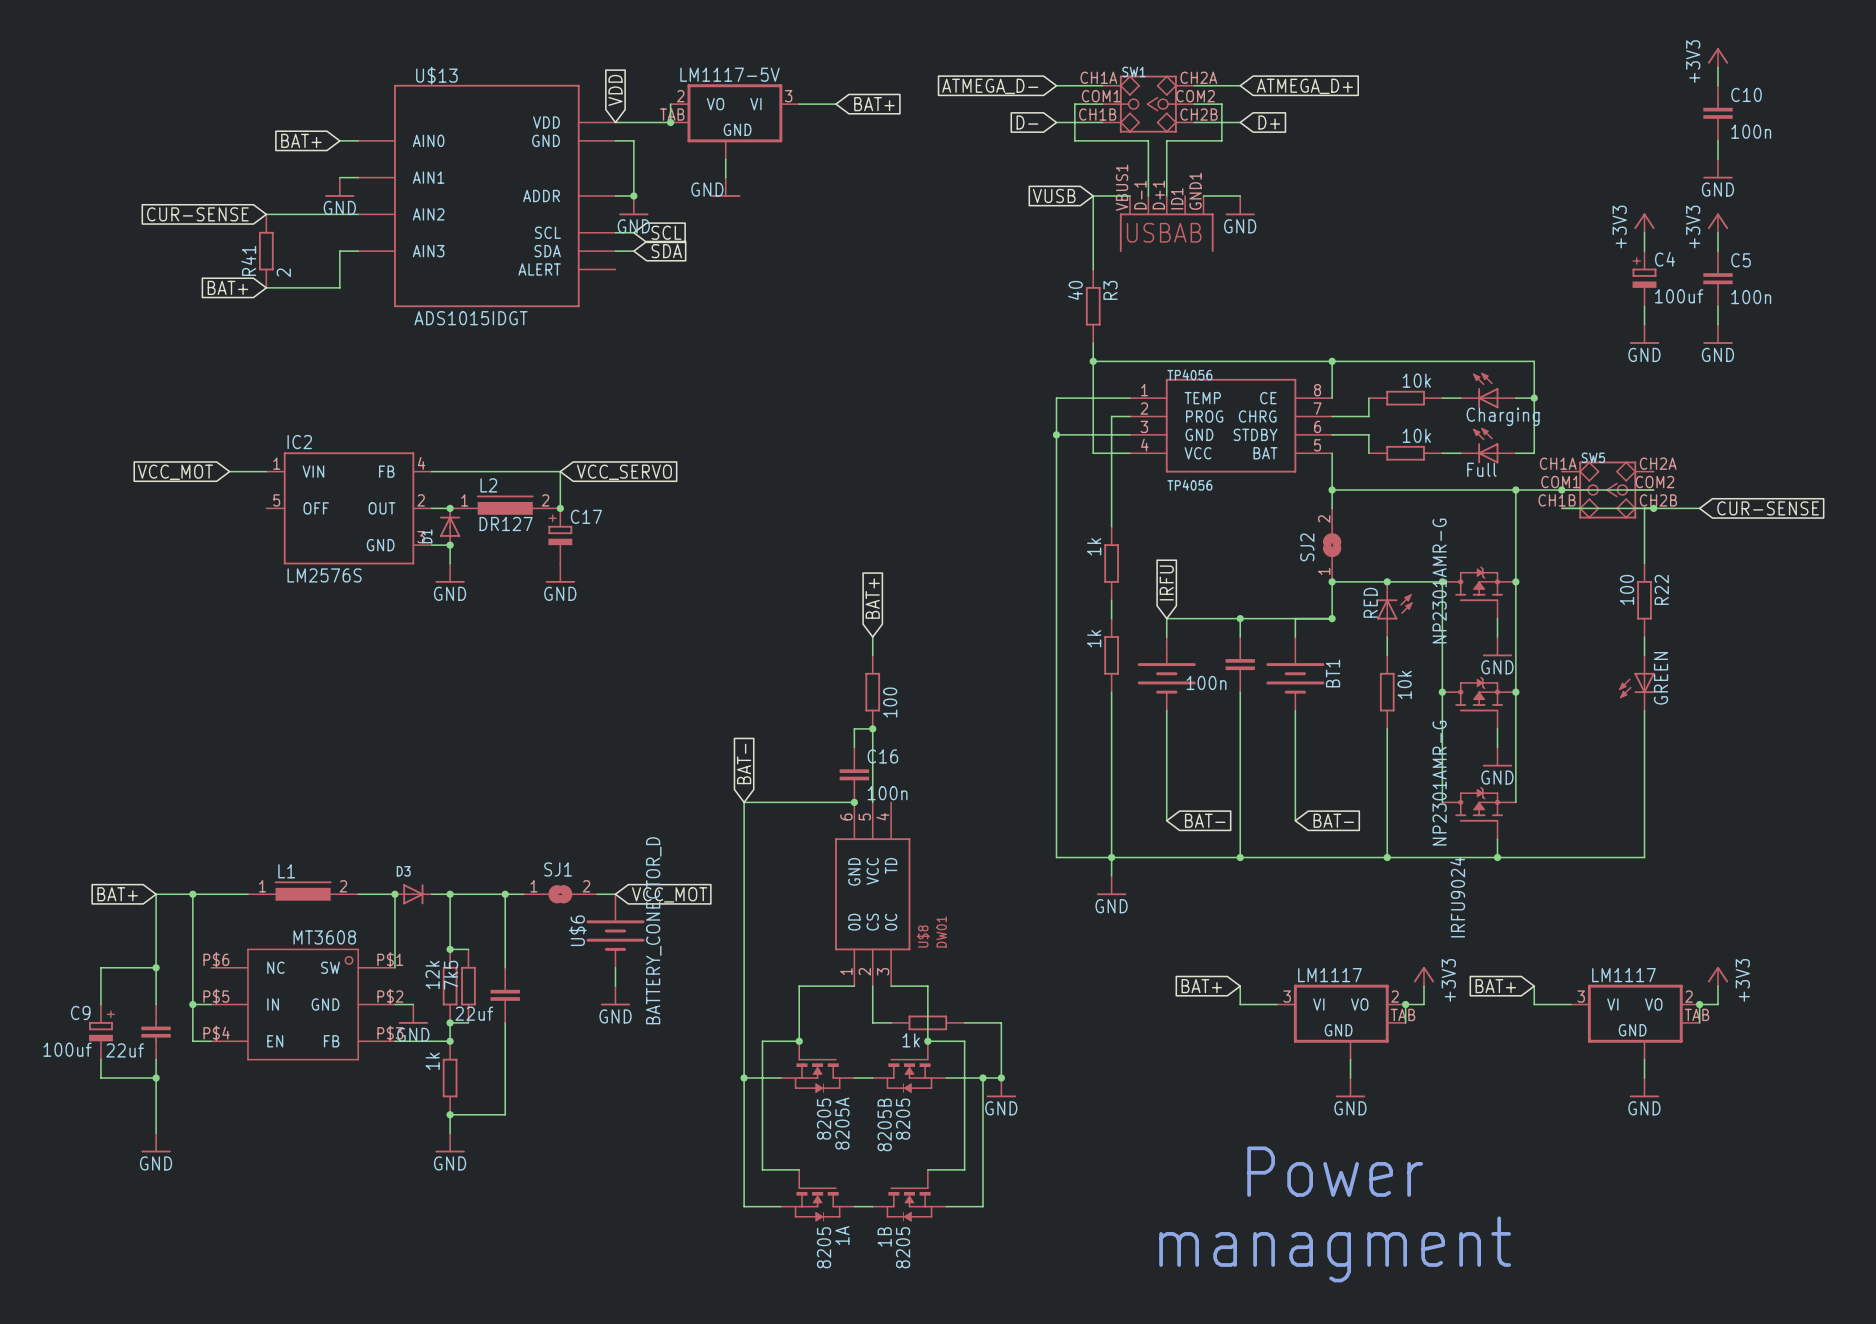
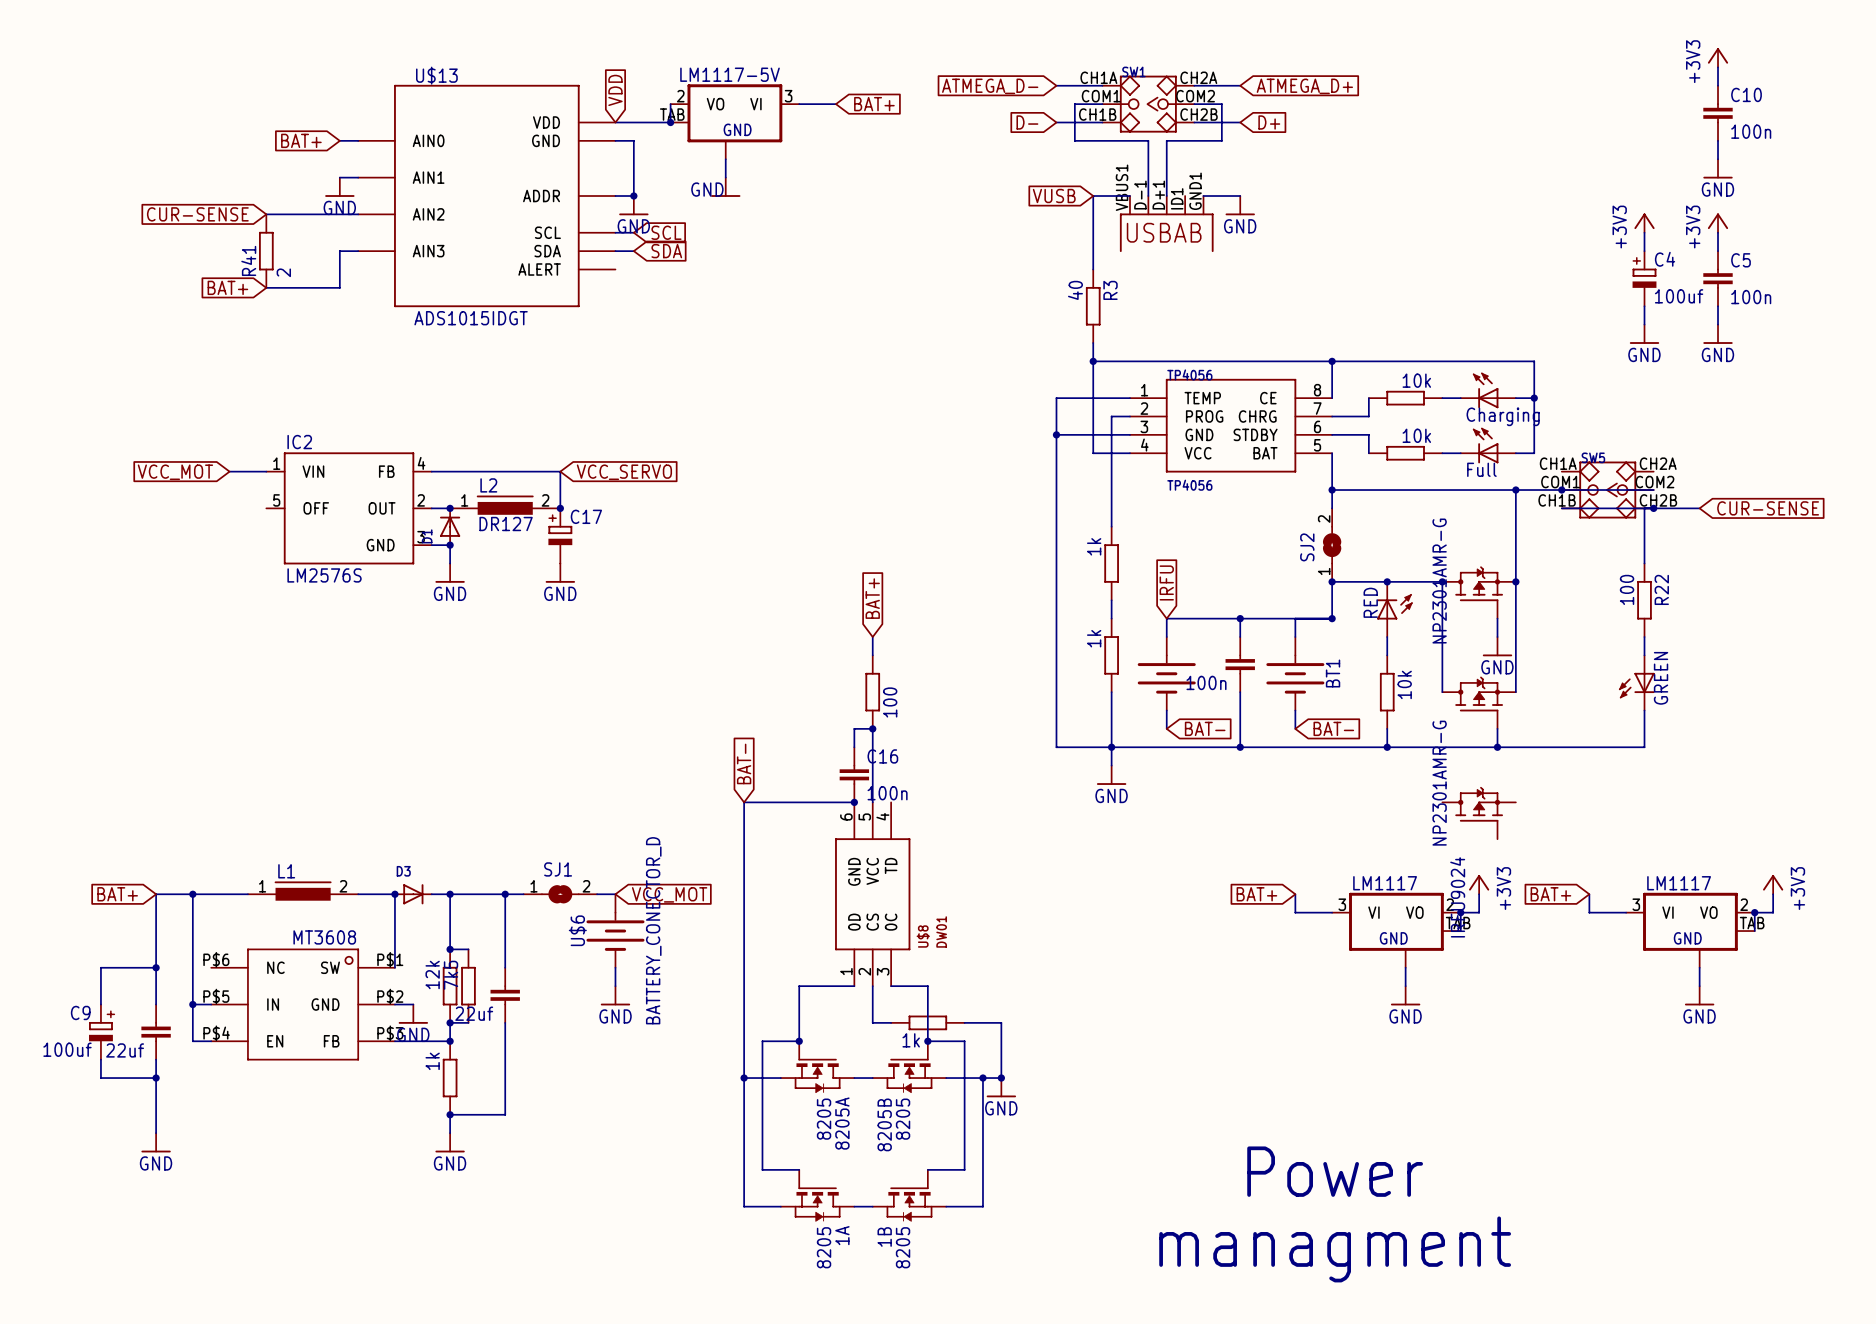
wire: (1442, 692) (1442, 802) -> none
junction: (1442, 692) -> none
wire: (1515, 692) (1515, 802) -> none
junction: (1515, 692) -> none
wire: (1166, 728) (1166, 820) -> none
global label: none -> BAT- (1205, 728)
wire: (1295, 728) (1295, 820) -> none
global label: none -> BAT- (1333, 728)
wire: (1056, 747) (1056, 857) (1644, 857) (1644, 747) -> (1056, 747) (1644, 747)
junction: none -> (1111, 747)
wire: (1240, 747) (1240, 857) -> none
junction: none -> (1240, 747)
wire: (1387, 747) (1387, 857) -> none
junction: none -> (1387, 747)
junction: none -> (1497, 747)
power symbol: GND (1497, 756) -> none
wire: (1111, 765) (1111, 875) -> none
global label: BAT- (1205, 820) -> none
global label: BAT- (1333, 820) -> none
wire: (1497, 839) (1497, 857) -> none
junction: (1111, 857) -> none
junction: (1240, 857) -> none
junction: (1387, 857) -> none
junction: (1497, 857) -> none
power symbol position: GND (1111, 885) -> GND (1111, 775)
junction: none -> (1460, 912)
junction: none -> (1754, 912)
power symbol position: +3V3 (1423, 976) -> +3V3 (1479, 884)
power symbol position: +3V3 (1718, 976) -> +3V3 (1773, 884)
global label position: BAT+ (1201, 986) -> BAT+ (1256, 894)
wire: (1240, 986) (1240, 1004) (1276, 1004) -> (1295, 894) (1295, 912) (1332, 912)
wire: (1423, 986) (1423, 1004) (1405, 1004) (1405, 1022) -> (1479, 894) (1479, 912) (1460, 912) (1460, 931)
global label position: BAT+ (1495, 986) -> BAT+ (1550, 894)
wire: (1534, 986) (1534, 1004) (1571, 1004) -> (1589, 894) (1589, 912) (1626, 912)
wire: (1718, 986) (1718, 1004) (1699, 1004) (1699, 1022) -> (1773, 894) (1773, 912) (1754, 912) (1754, 931)
junction: (1405, 1004) -> none
junction: (1699, 1004) -> none
part position: (1341, 1022) -> (1396, 930)
part position: (1635, 1022) -> (1690, 930)
wire: (1350, 1059) (1350, 1078) -> (1405, 967) (1405, 986)
wire: (1644, 1059) (1644, 1078) -> (1699, 967) (1699, 986)
power symbol position: GND (1350, 1087) -> GND (1405, 995)
power symbol position: GND (1644, 1087) -> GND (1699, 995)

